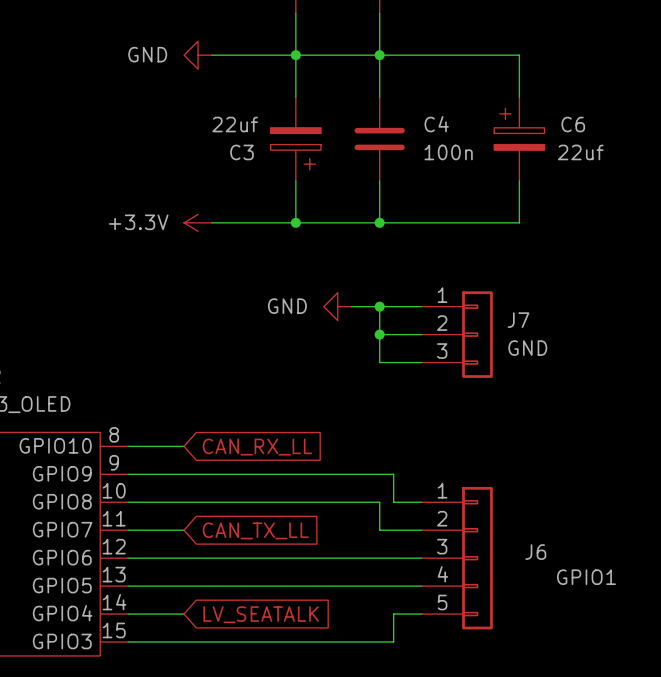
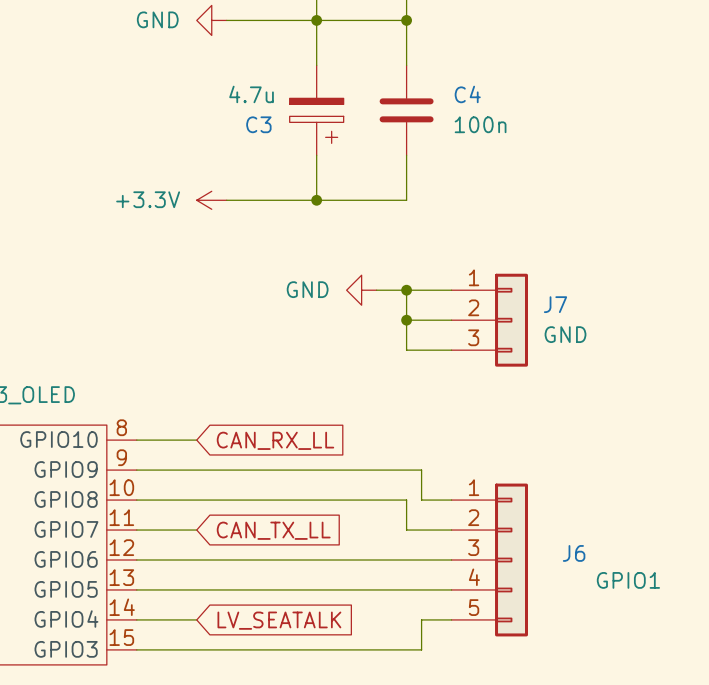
wire: (379, 55) (519, 55) (519, 97) -> none
C3 value: 22uf (235, 124) -> 4.7u (251, 94)
C6: 22uf (519, 139) -> none
wire: (519, 180) (519, 222) (379, 222) -> none
junction: (379, 222) -> none

